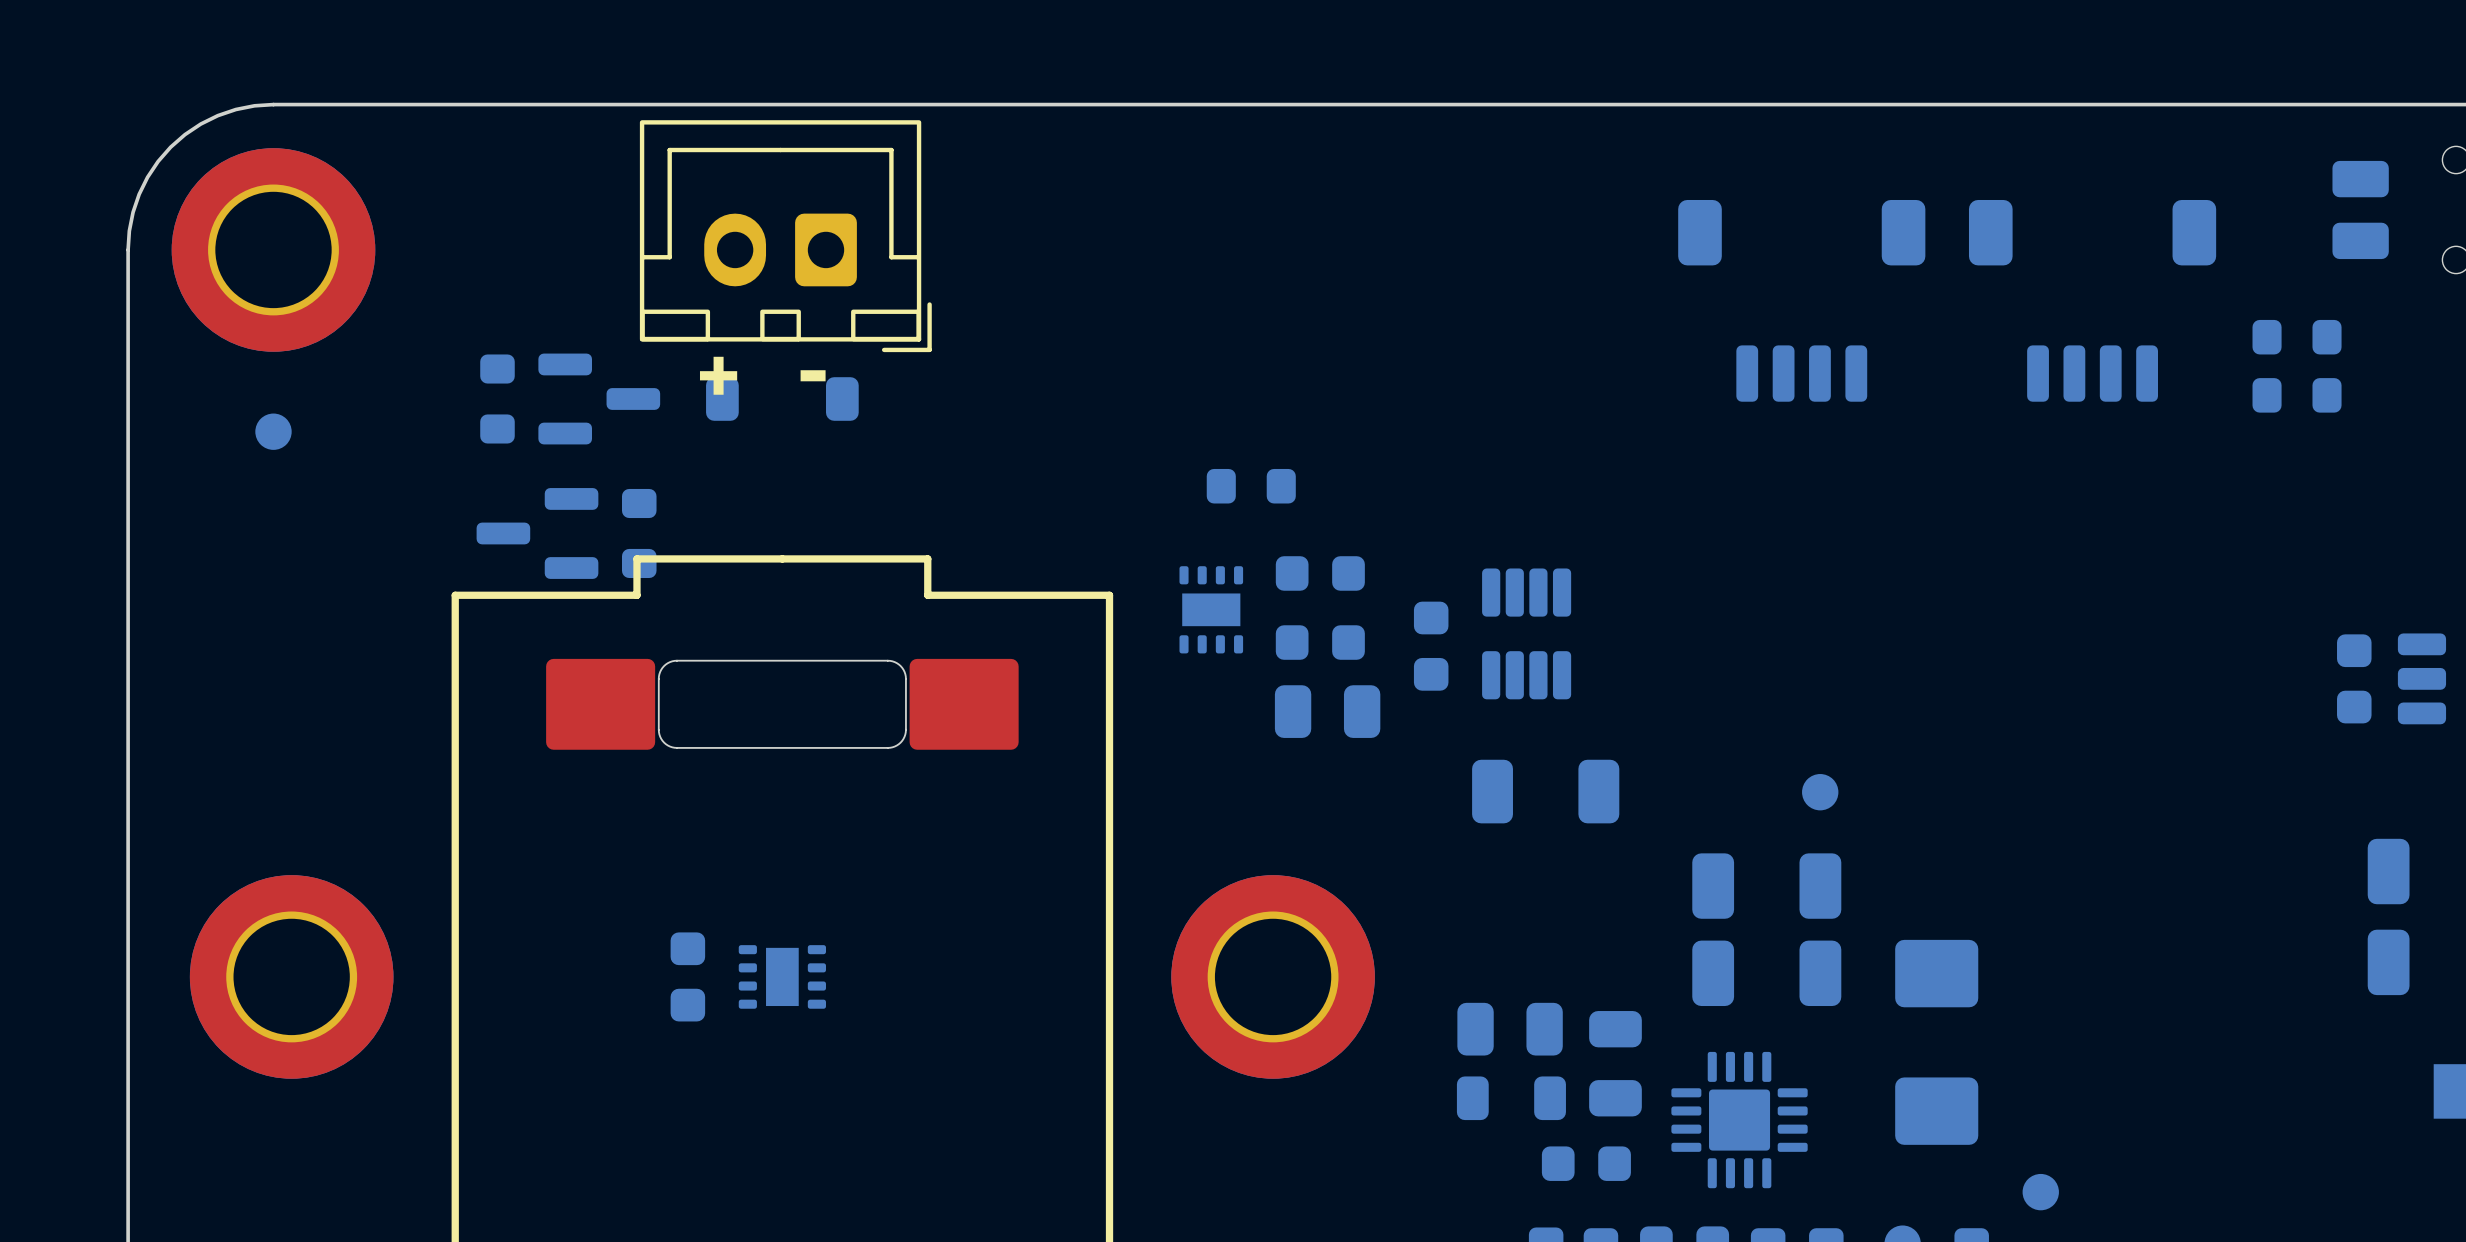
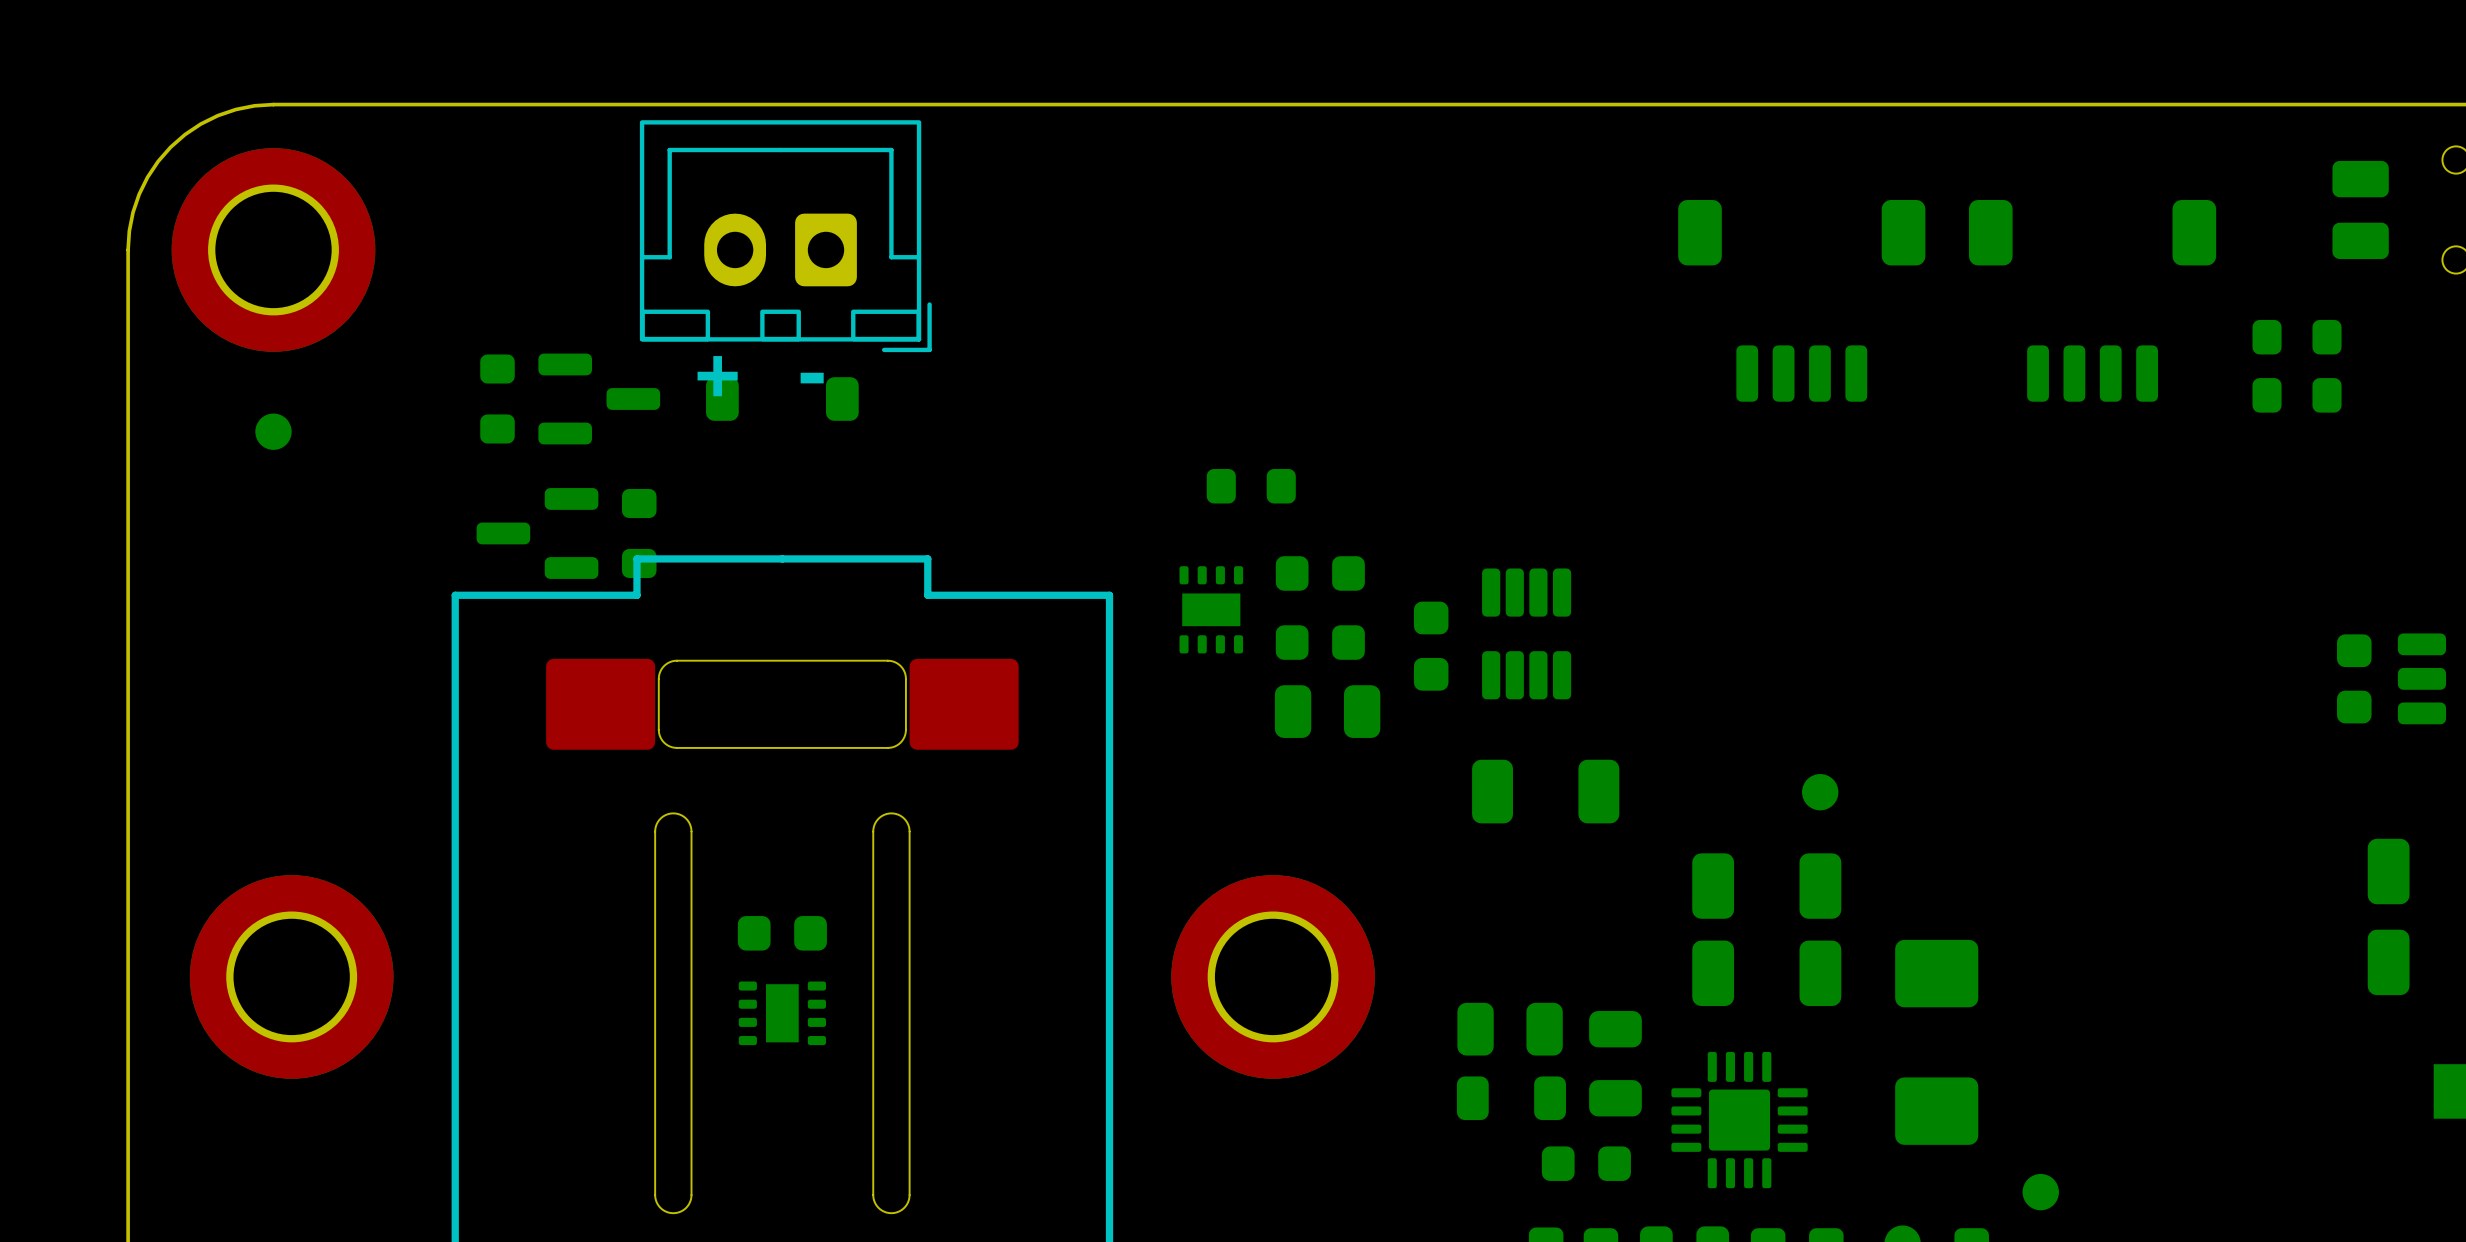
board edge: none -> (655, 831) (655, 1195) (660, 1207) (673, 1213) (686, 1207) (691, 1195) (691, 831) (686, 818) (673, 813) (660, 818) (655, 831)
board edge: none -> (873, 831) (873, 1195) (878, 1207) (891, 1213) (904, 1207) (909, 1195) (909, 831) (904, 818) (891, 813) (878, 818) (873, 831)
part rotation: 0° (687, 976) -> 90° clockwise (782, 933)
part position: (687, 976) -> (782, 933)
part position: (782, 976) -> (782, 1013)

